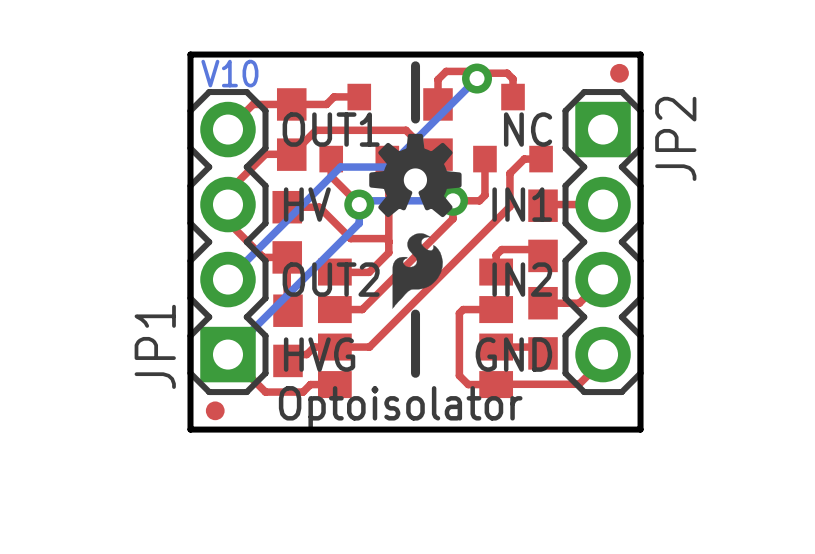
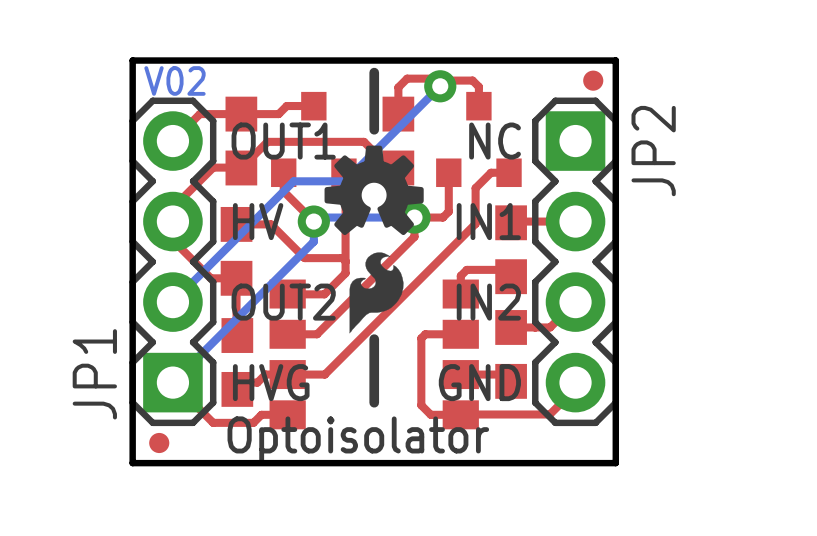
text: V10 (229, 73) -> V02 (174, 80)

